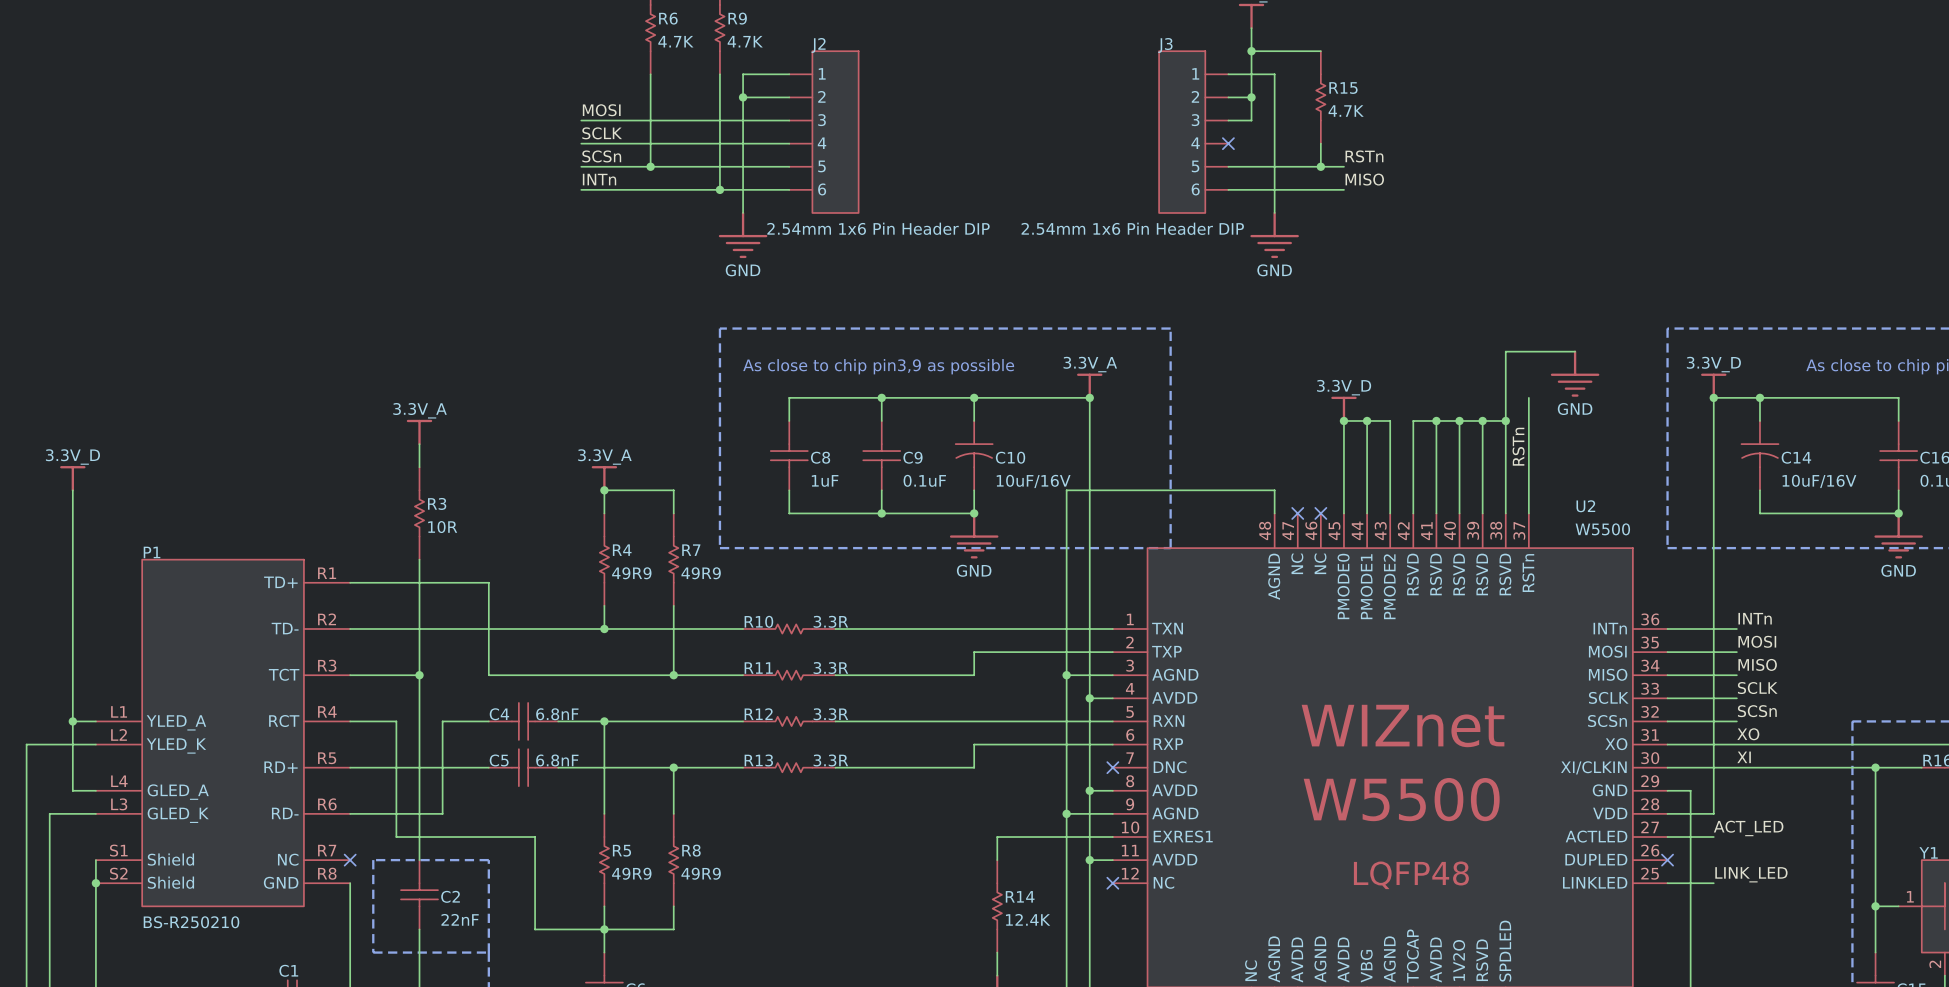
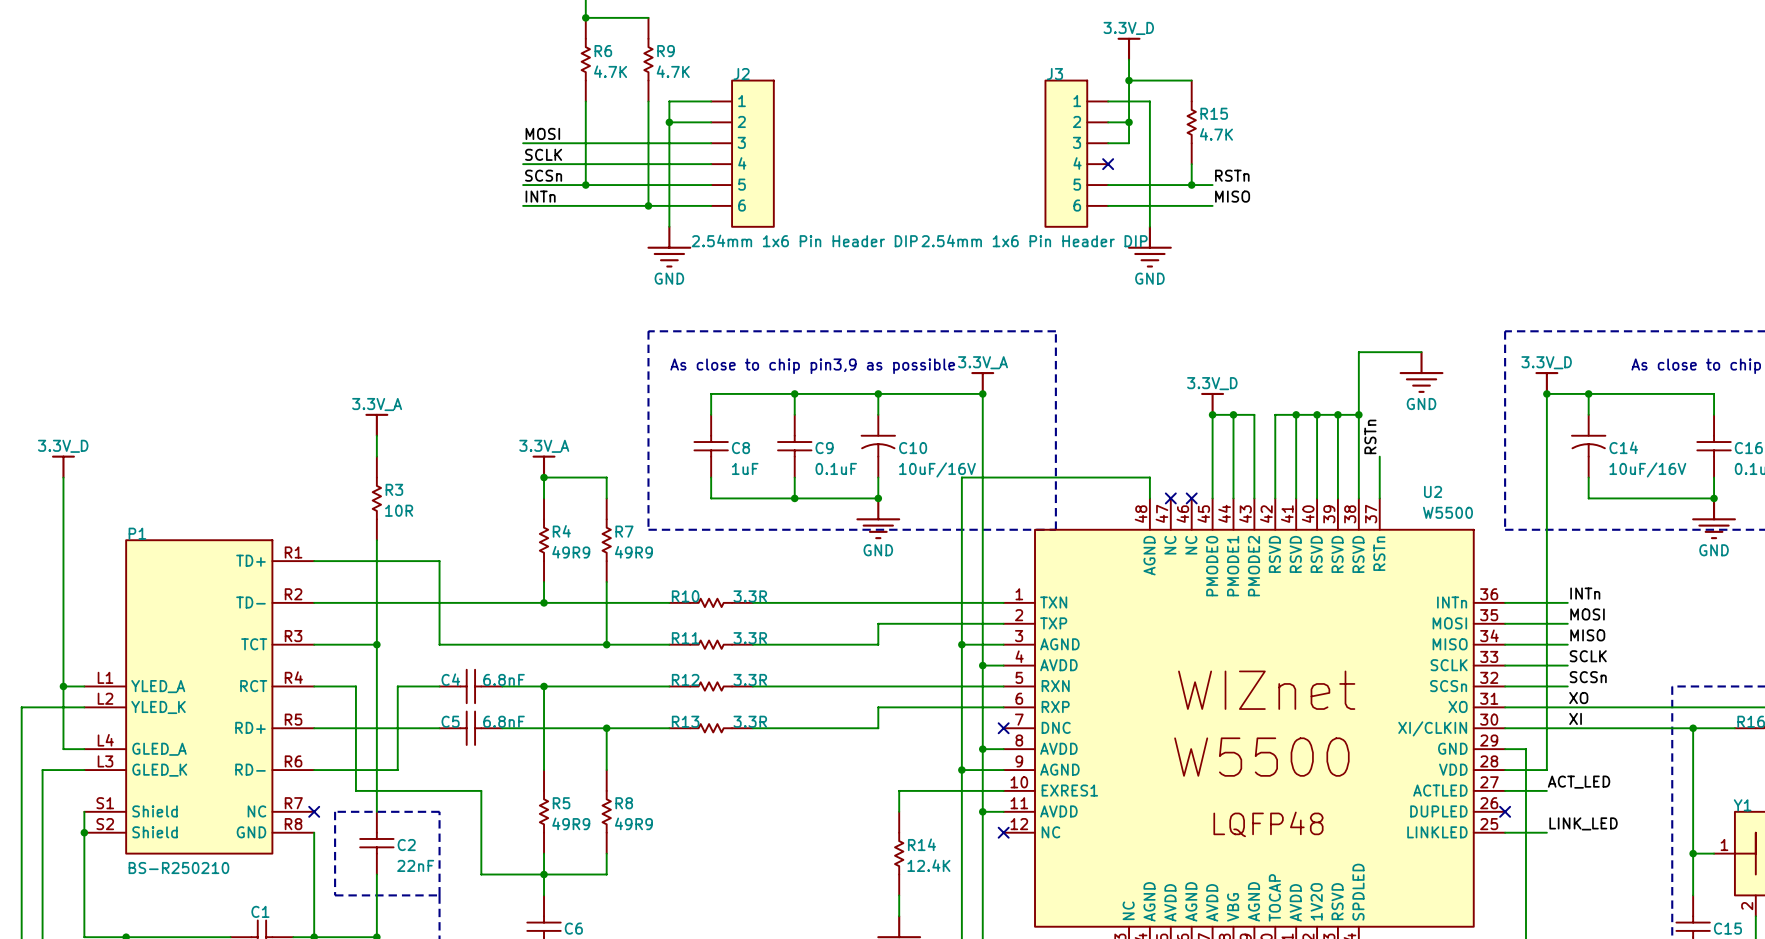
wire: (1528, 397) (1528, 467) -> none

